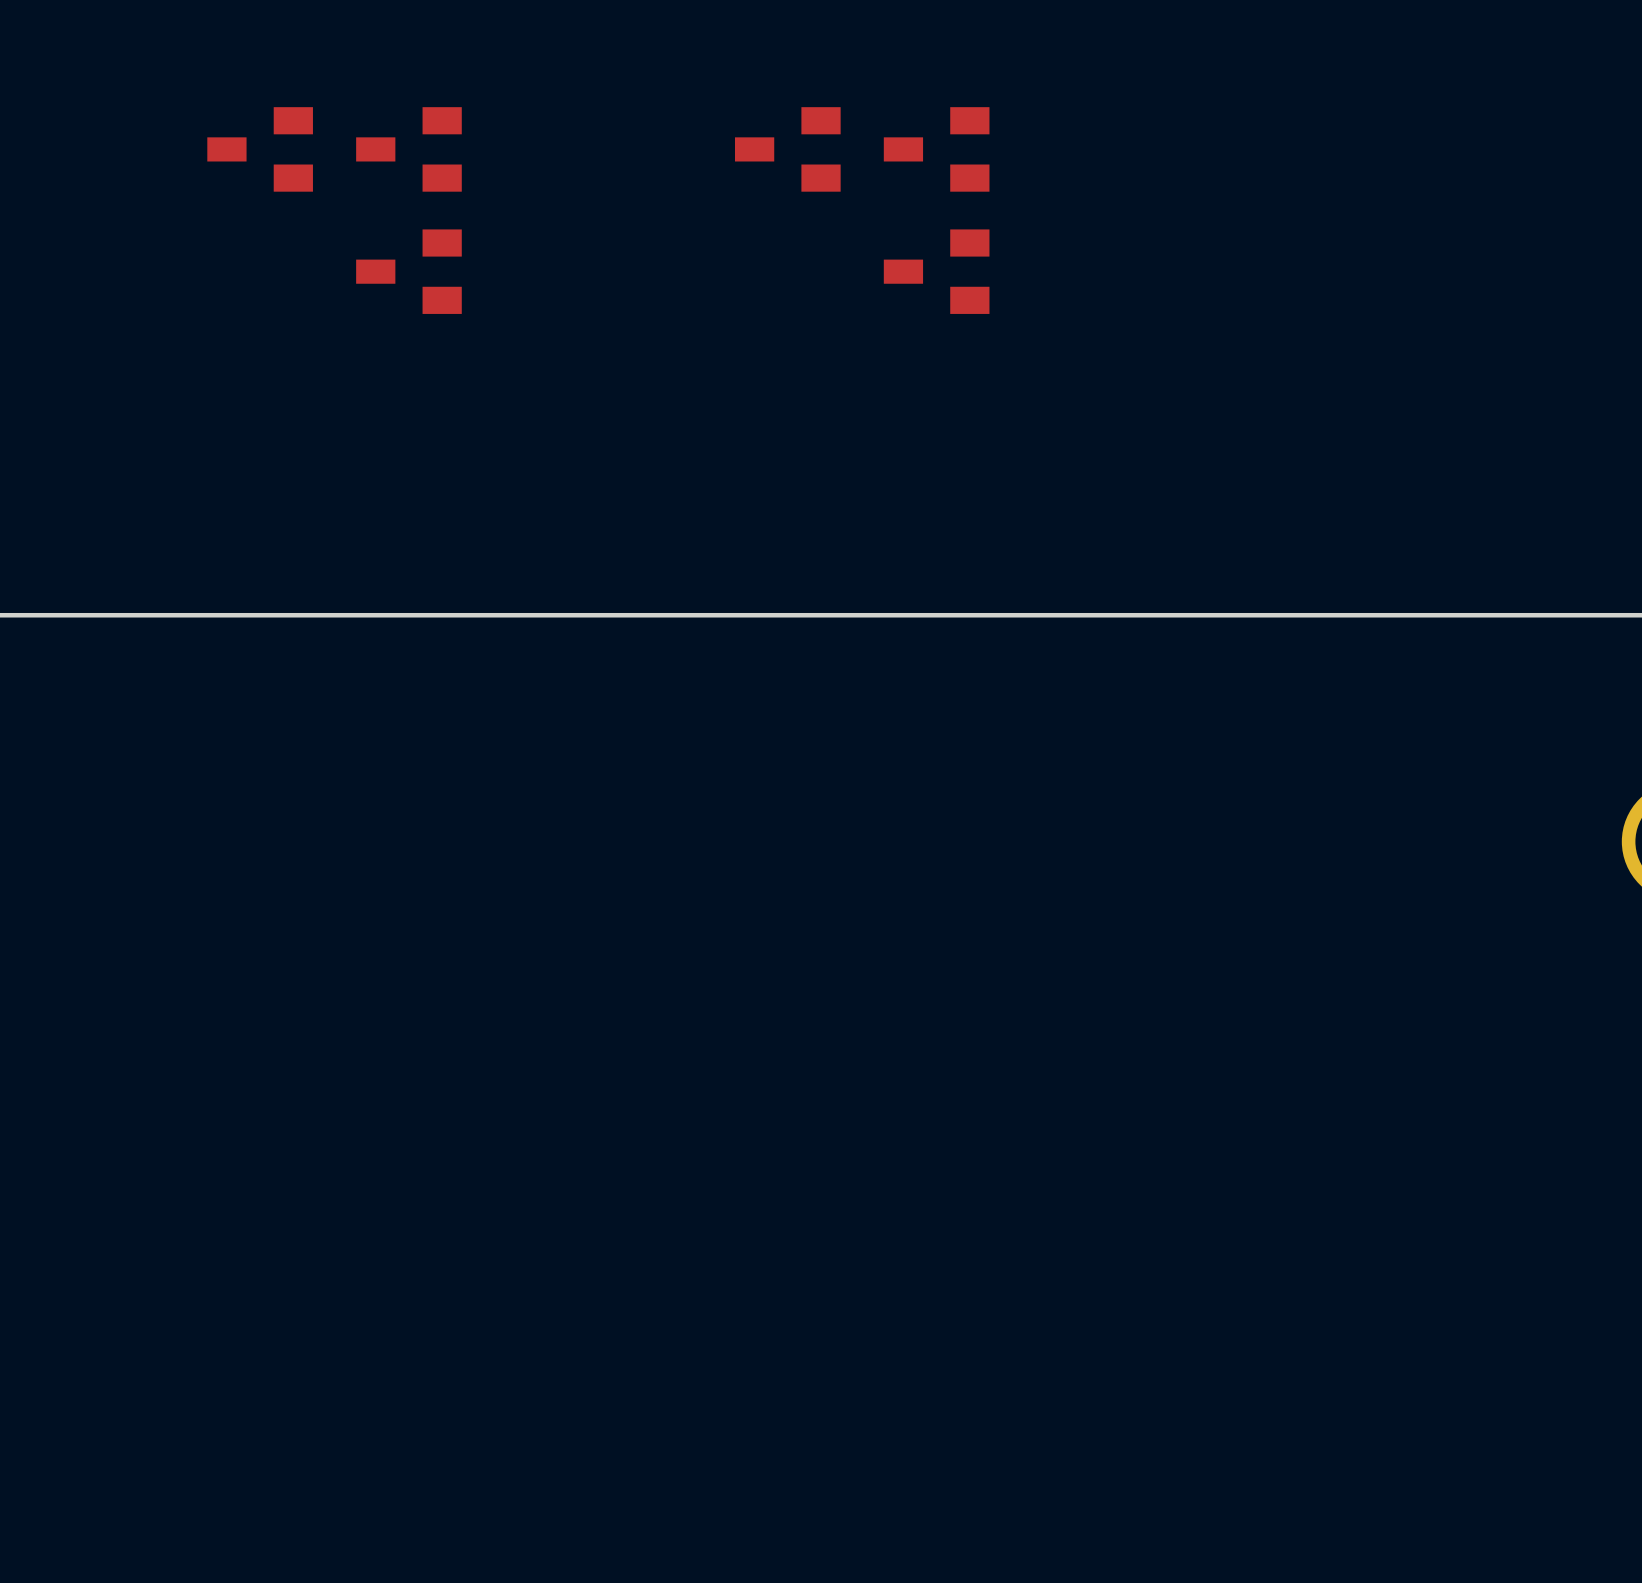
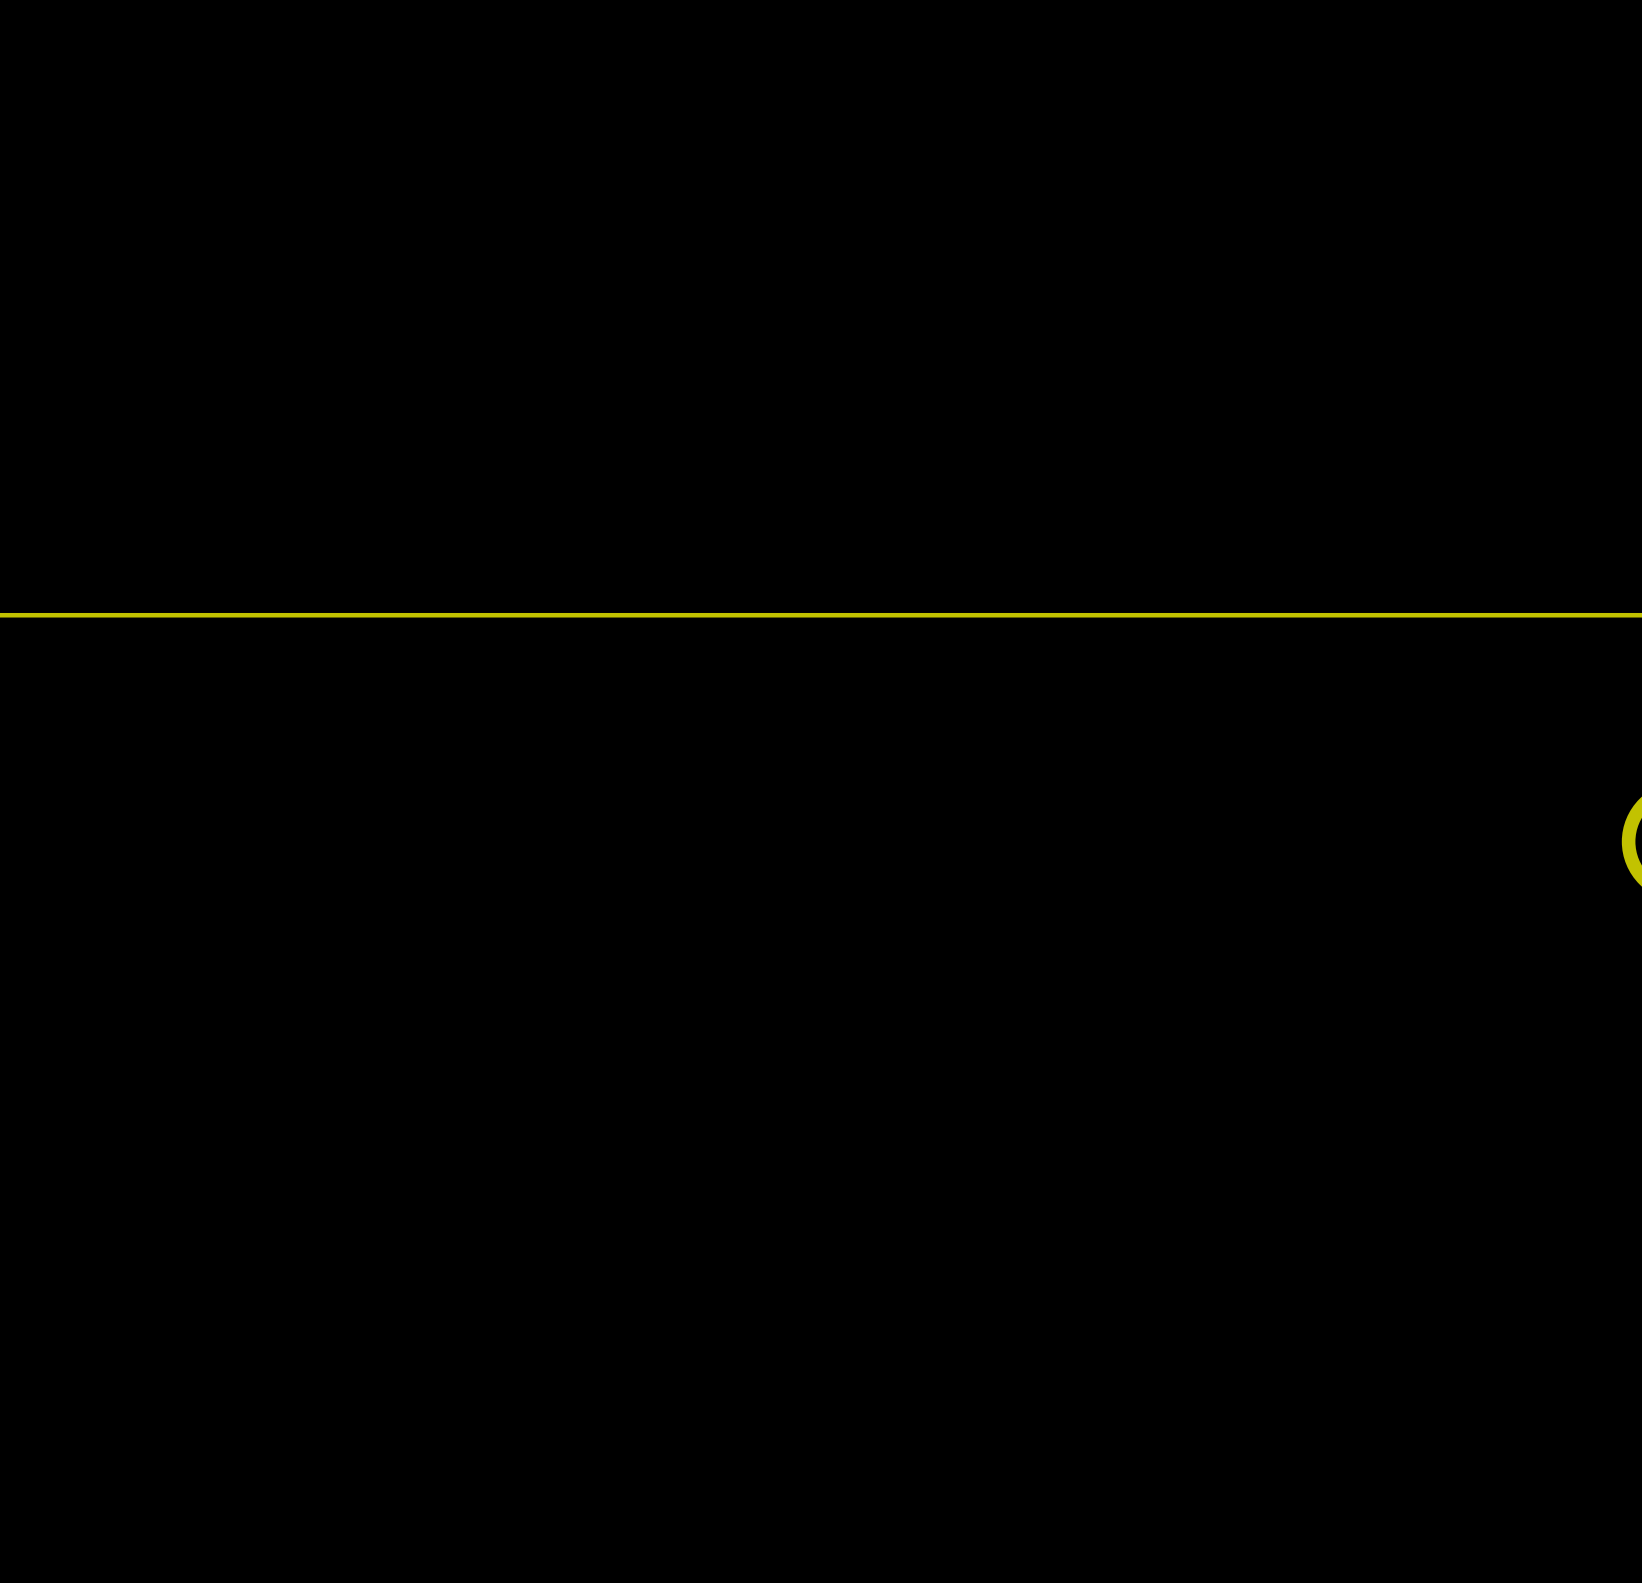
part: (260, 149) -> none
part: (408, 149) -> none
part: (787, 149) -> none
part: (936, 149) -> none
part: (408, 271) -> none
part: (936, 271) -> none

